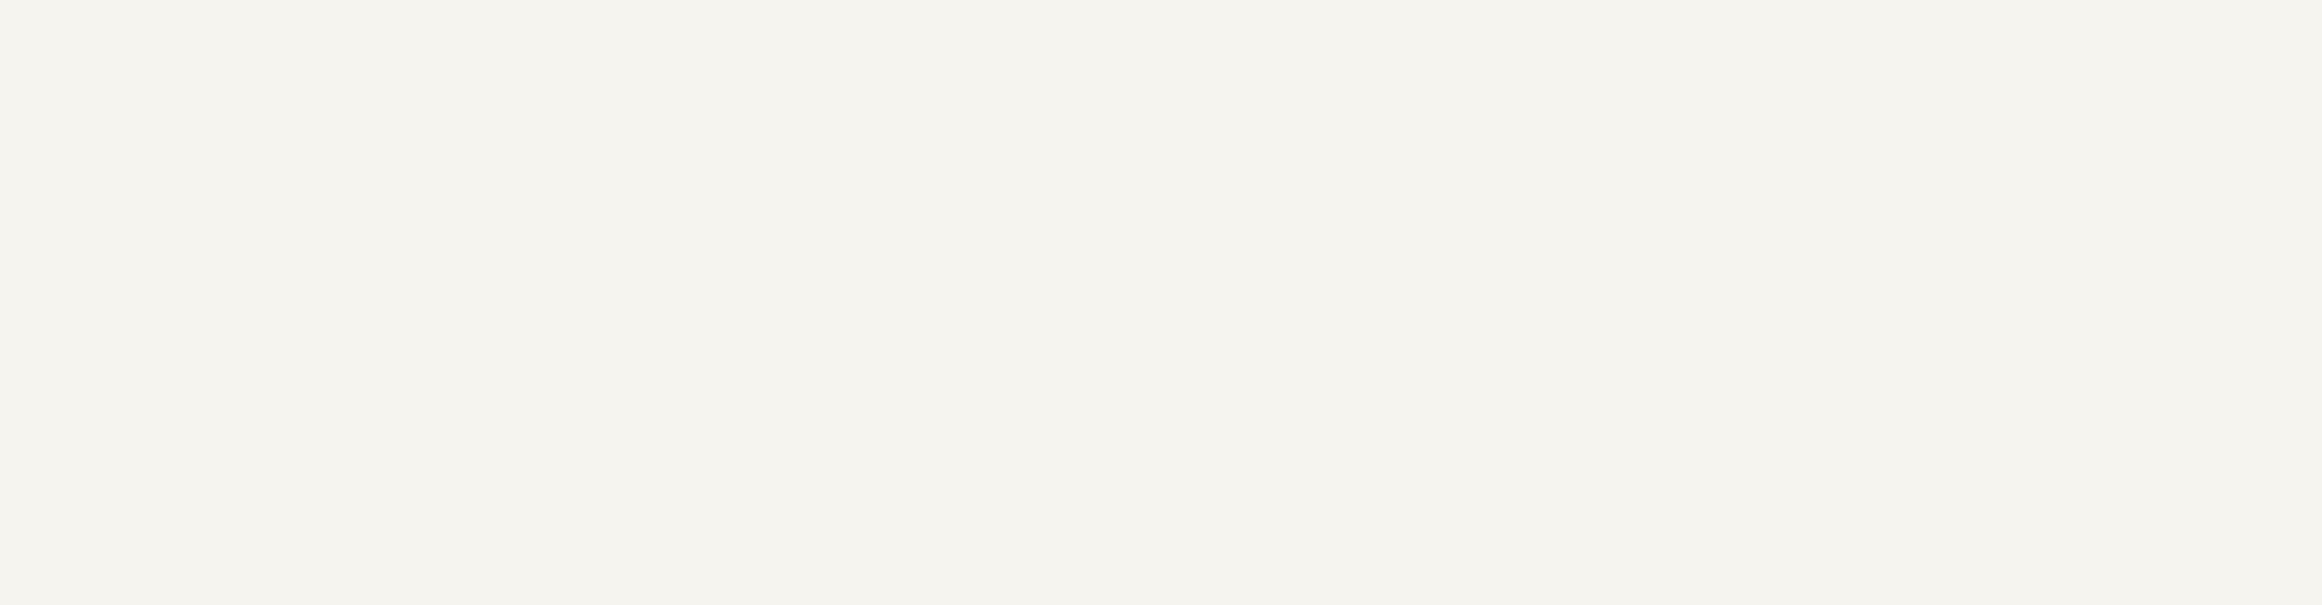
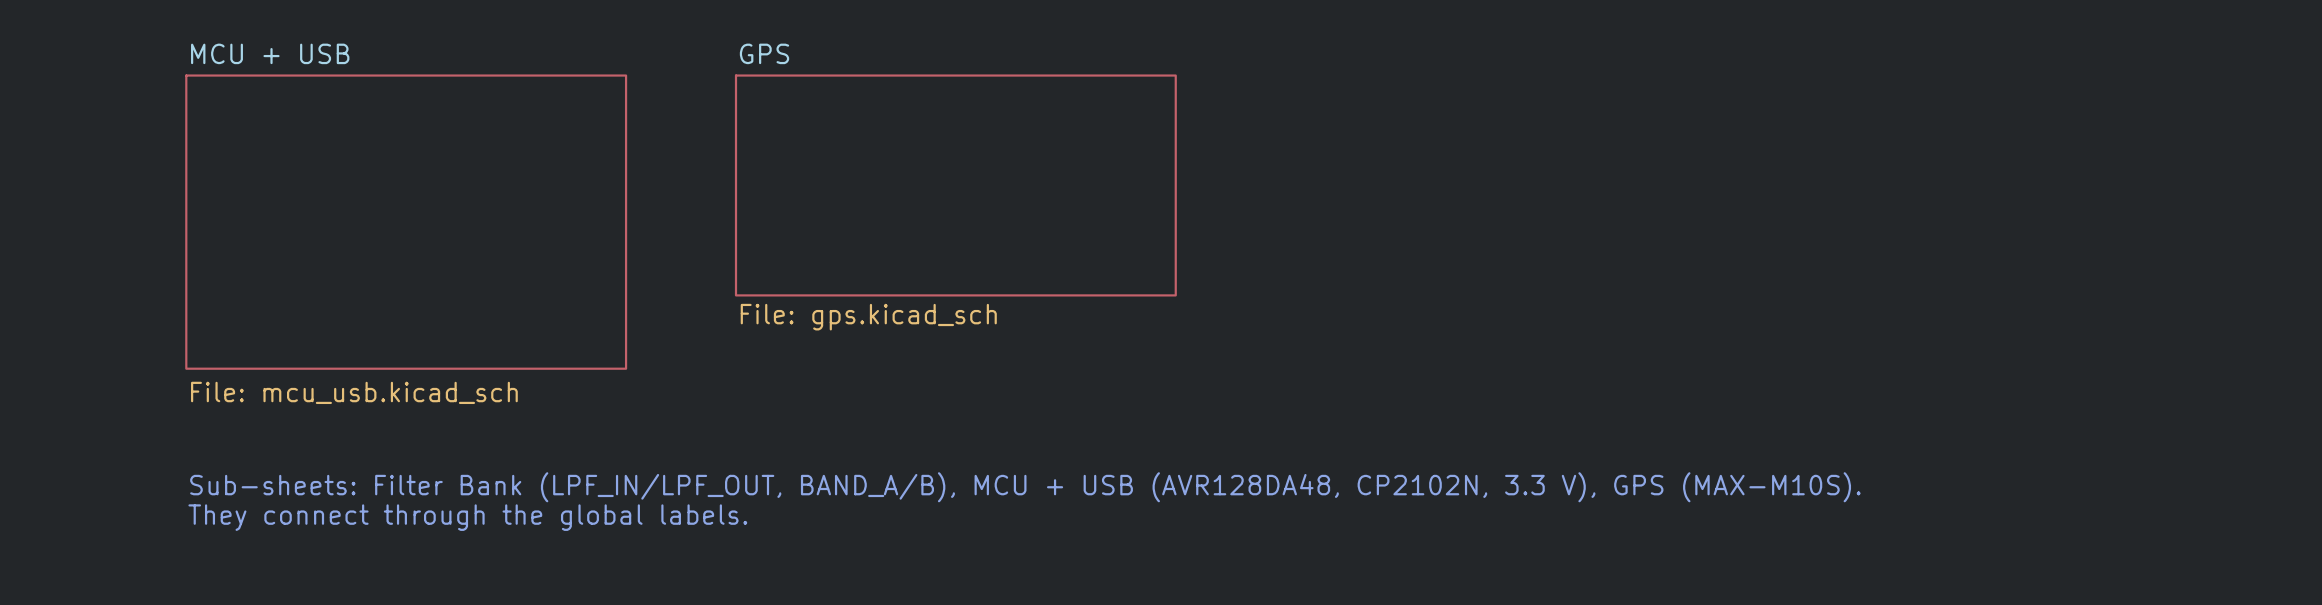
sheet GPS: none -> File: gps.kicad_sch (955, 185)
sheet MCU + USB: none -> File: mcu_usb.kicad_sch (406, 222)
text: none -> Sub-sheets: Filter Bank (LPF_IN/LPF_OUT, BAND_A/B), MCU + USB (AVR128DA48, CP2102N, 3.3 V), GPS (MAX-M10S). (1025, 487)
text: none -> They connect through the global labels. (467, 517)

